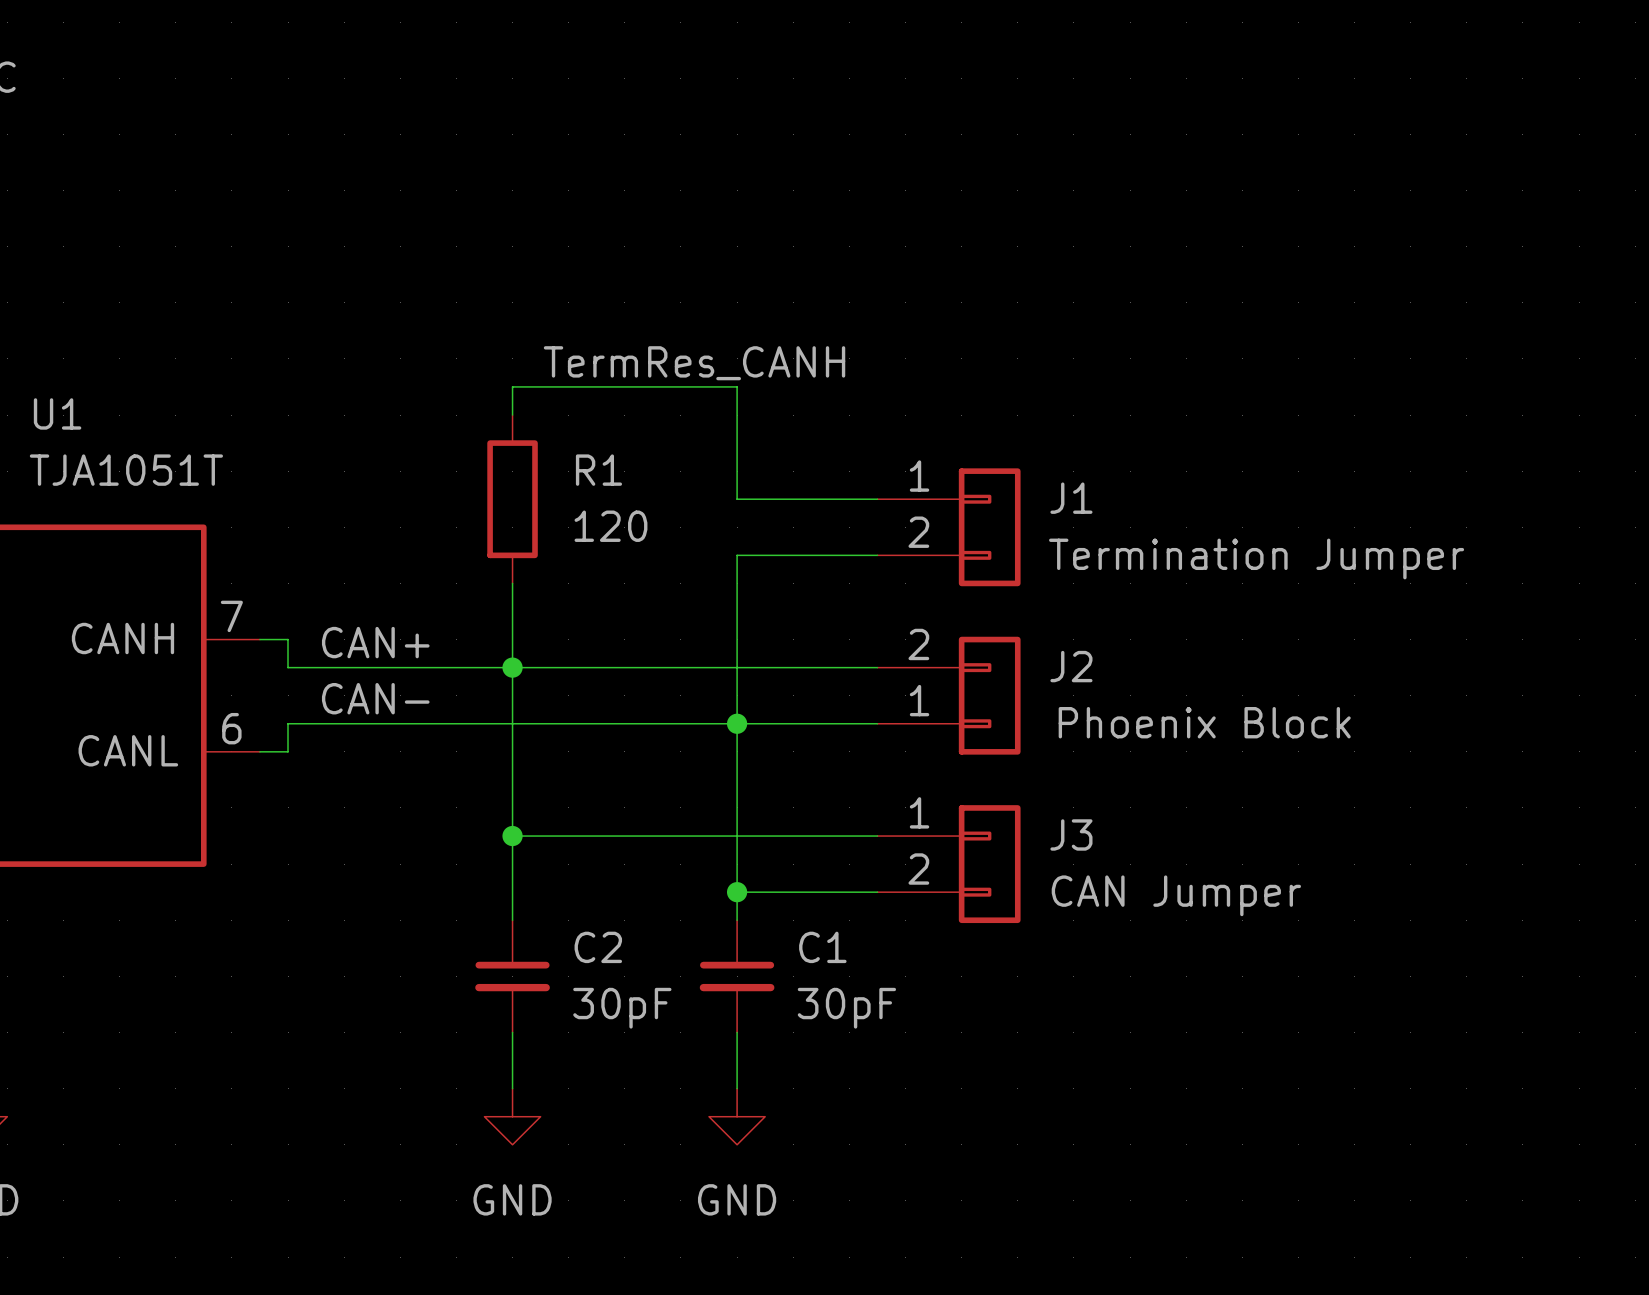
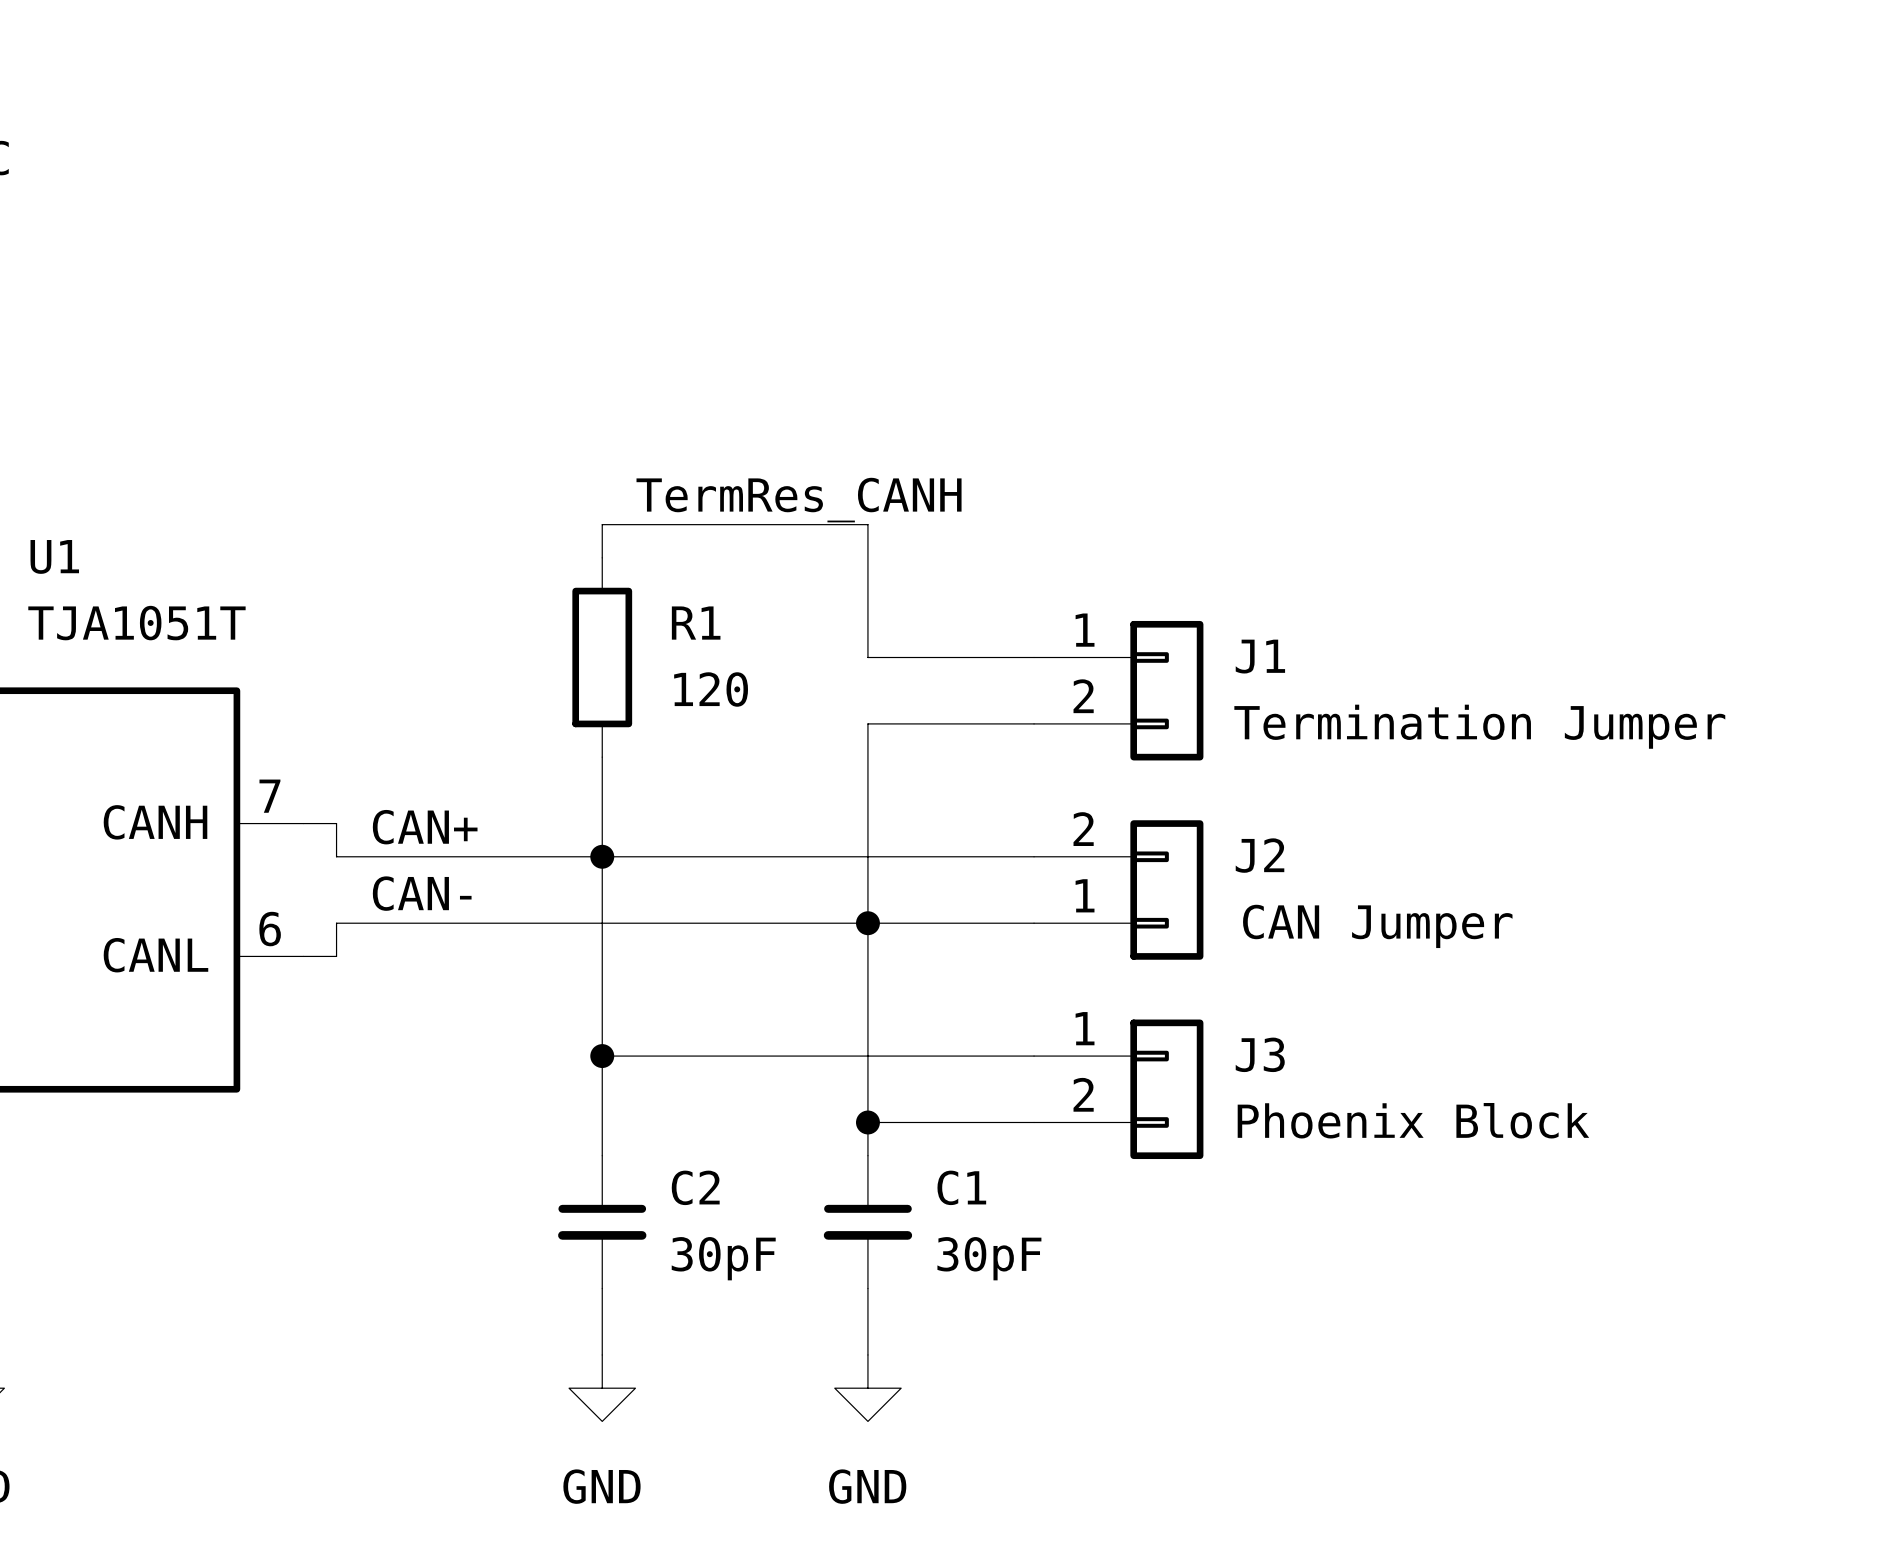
J2 value: Phoenix Block (1204, 722) -> CAN Jumper (1377, 926)
J3 value: CAN Jumper (1176, 895) -> Phoenix Block (1413, 1120)

